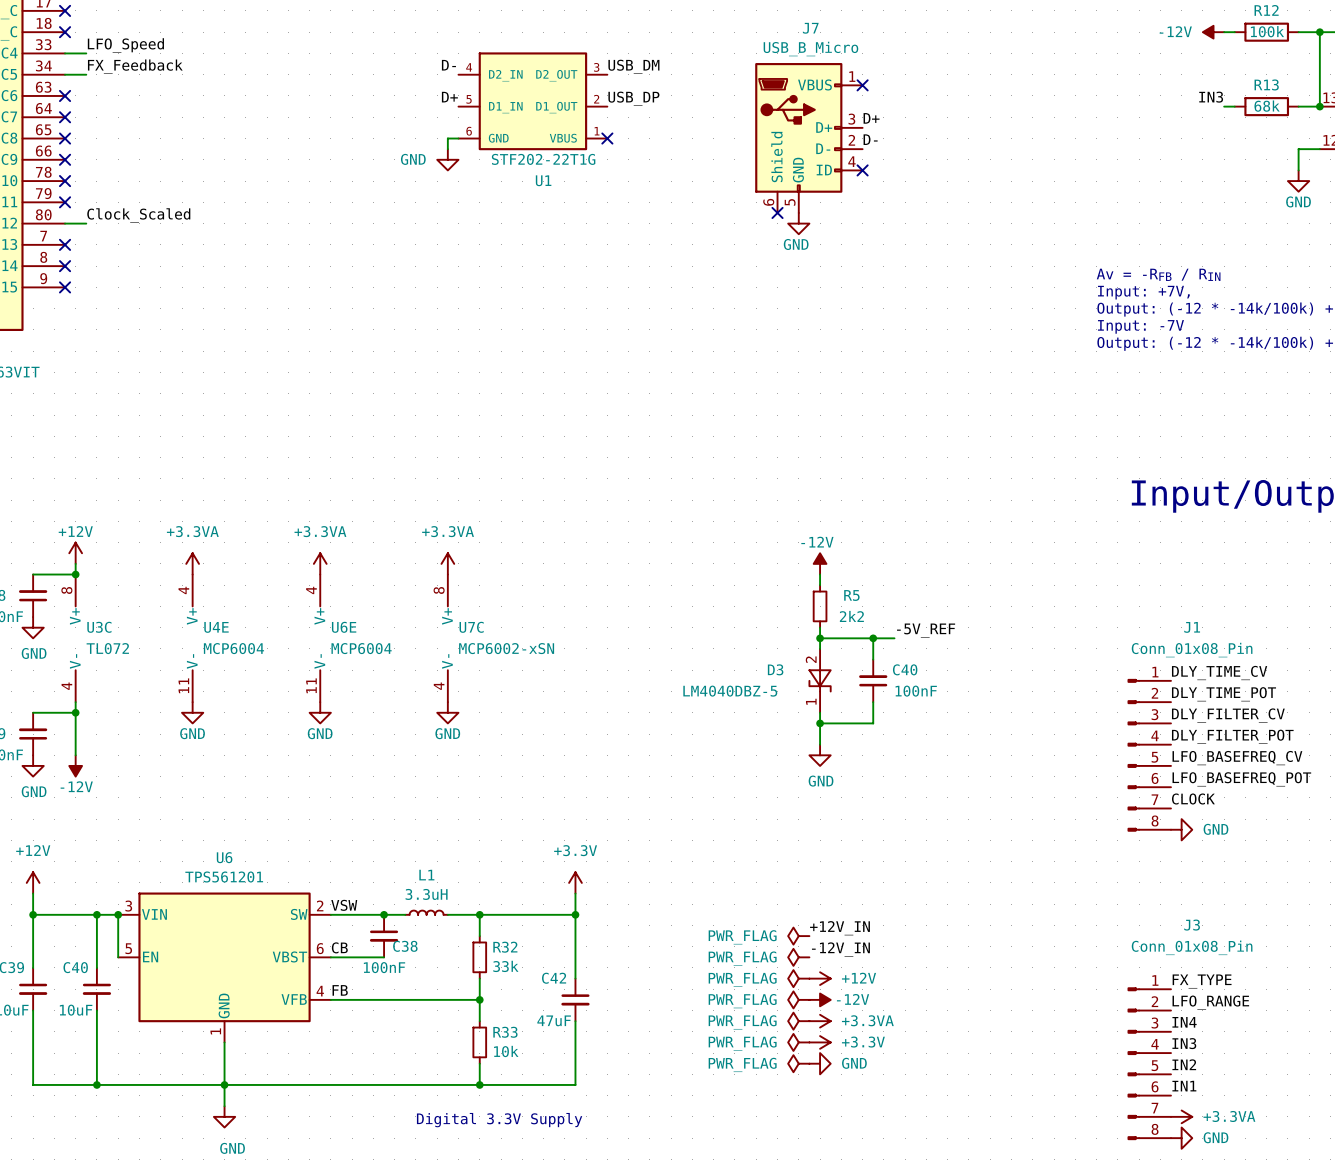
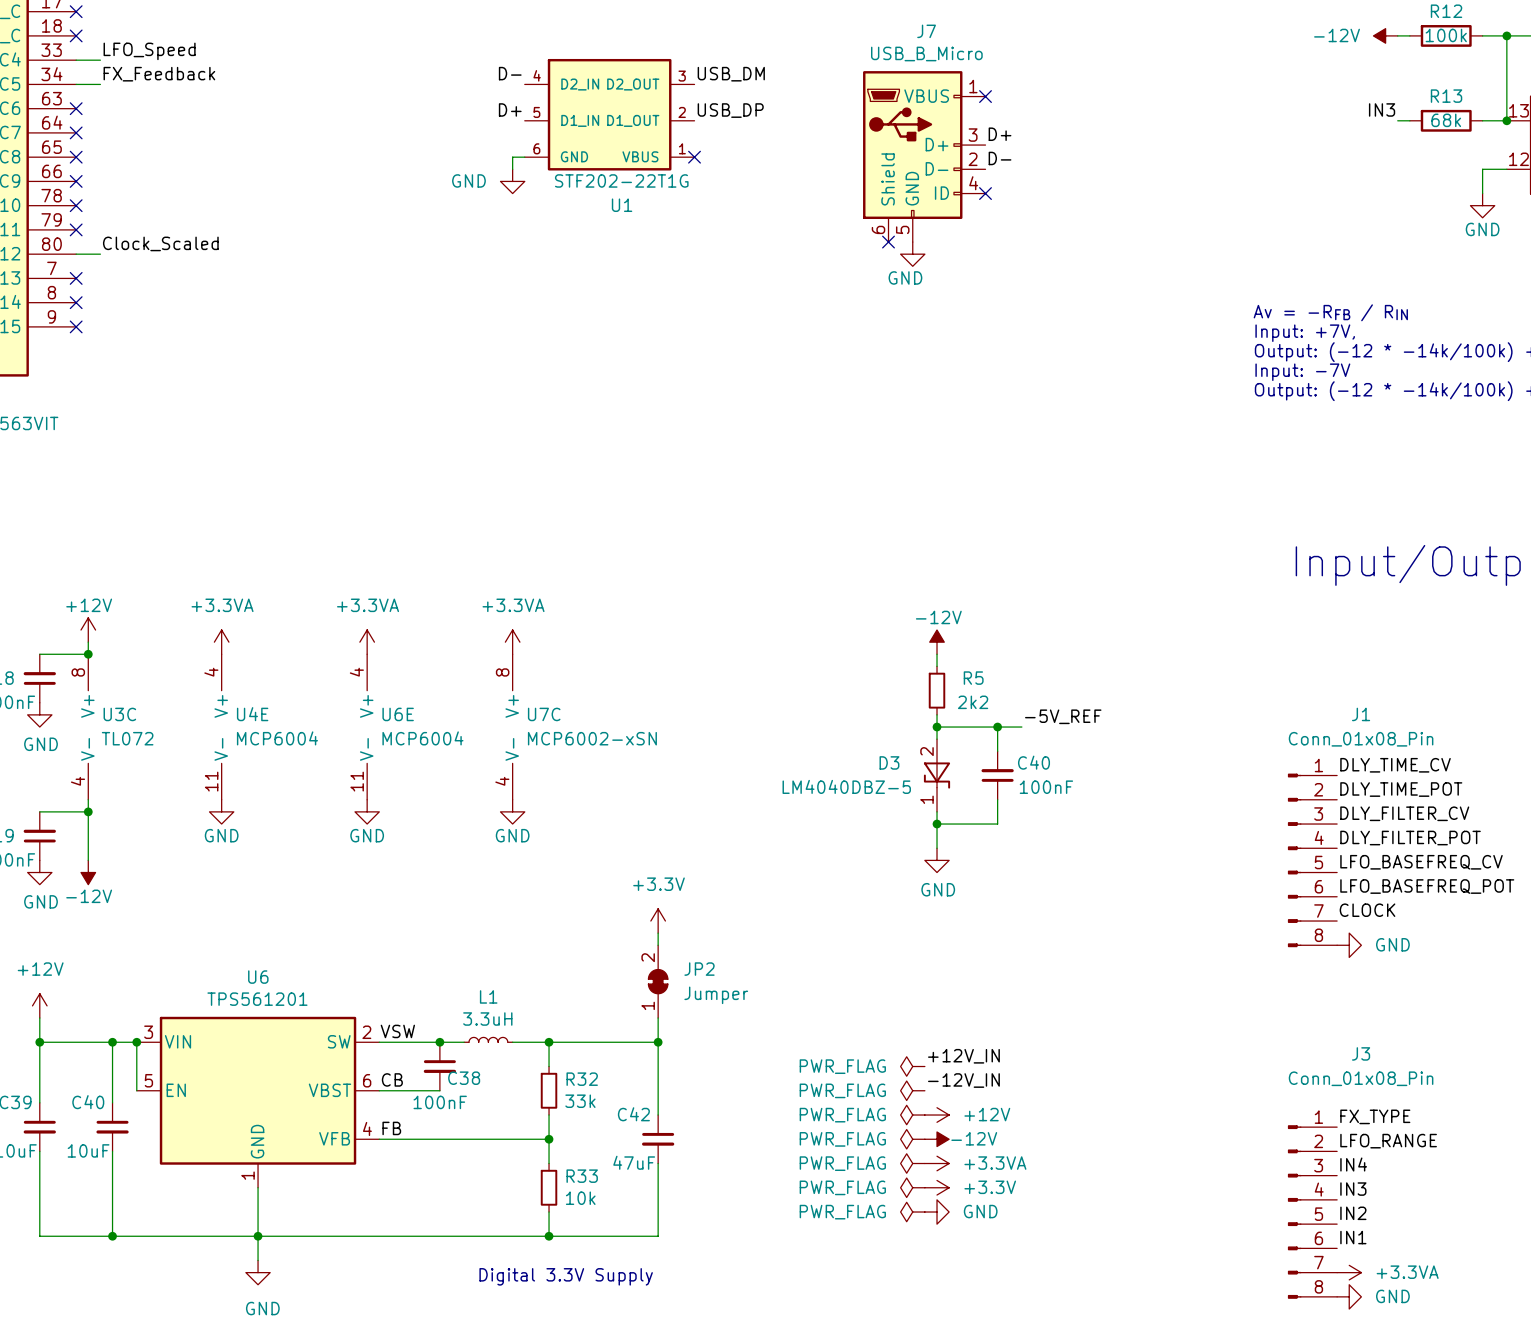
wire: none -> (658, 933) (658, 945)
JP2: none -> Jumper (658, 981)
power symbol position: +3.3V (575, 882) -> +3.3V (658, 921)

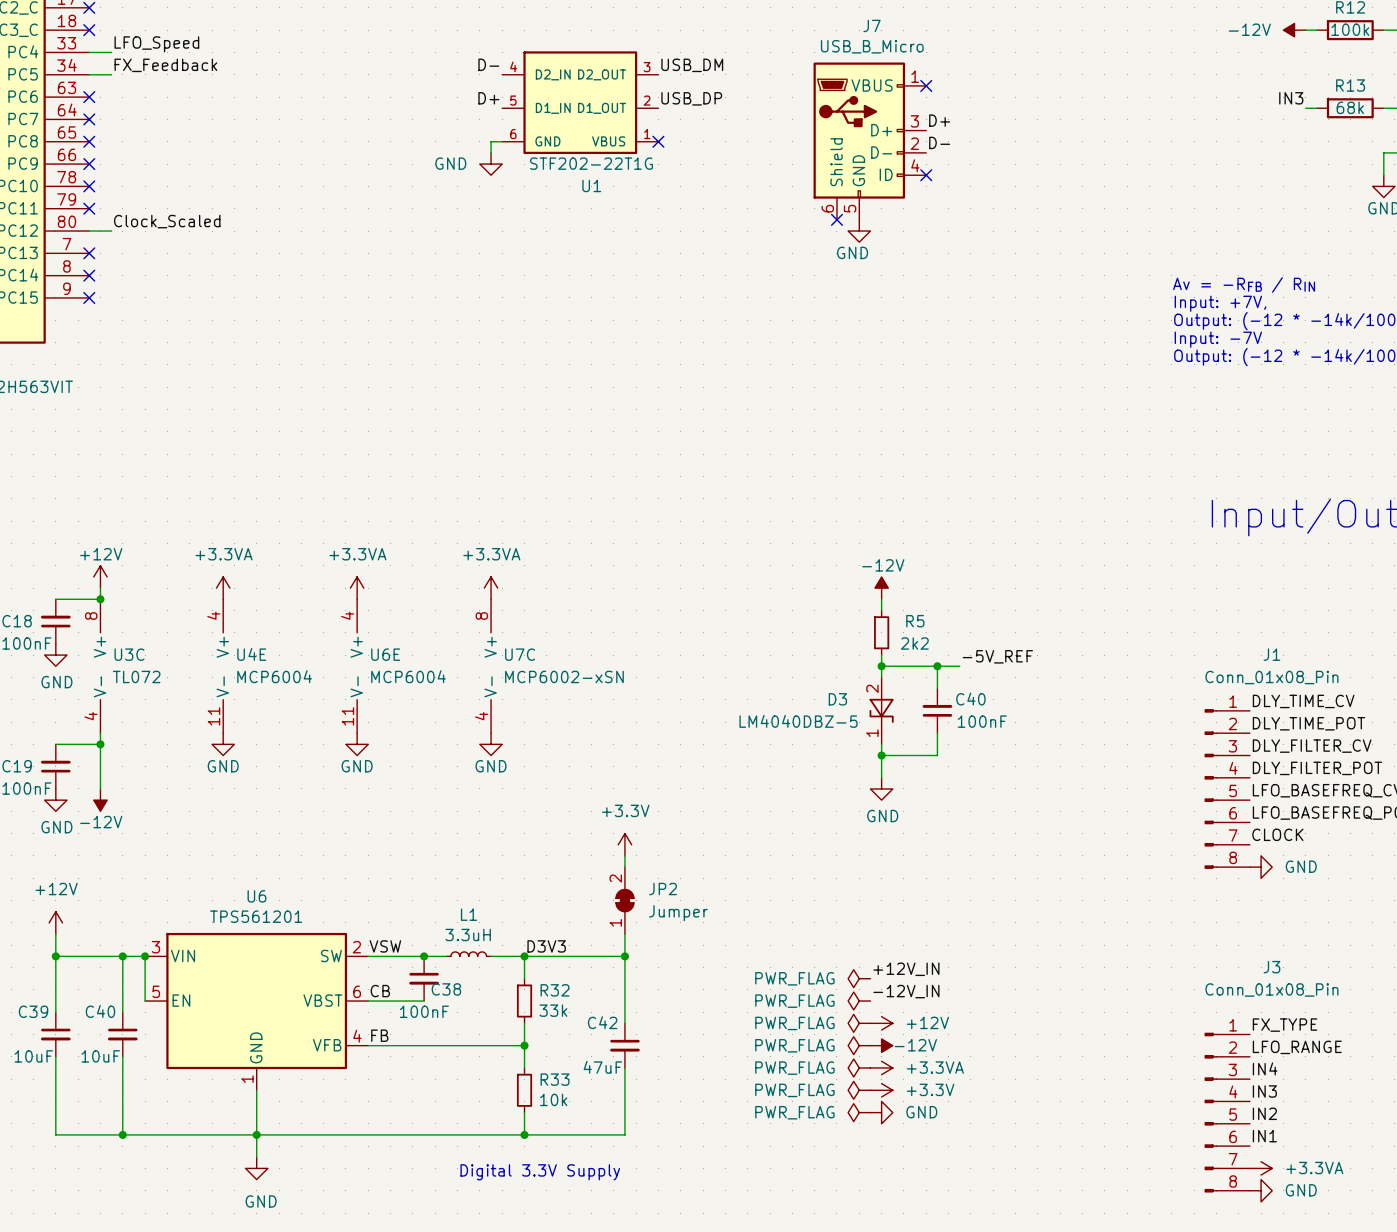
label: none -> D3V3 (546, 946)

